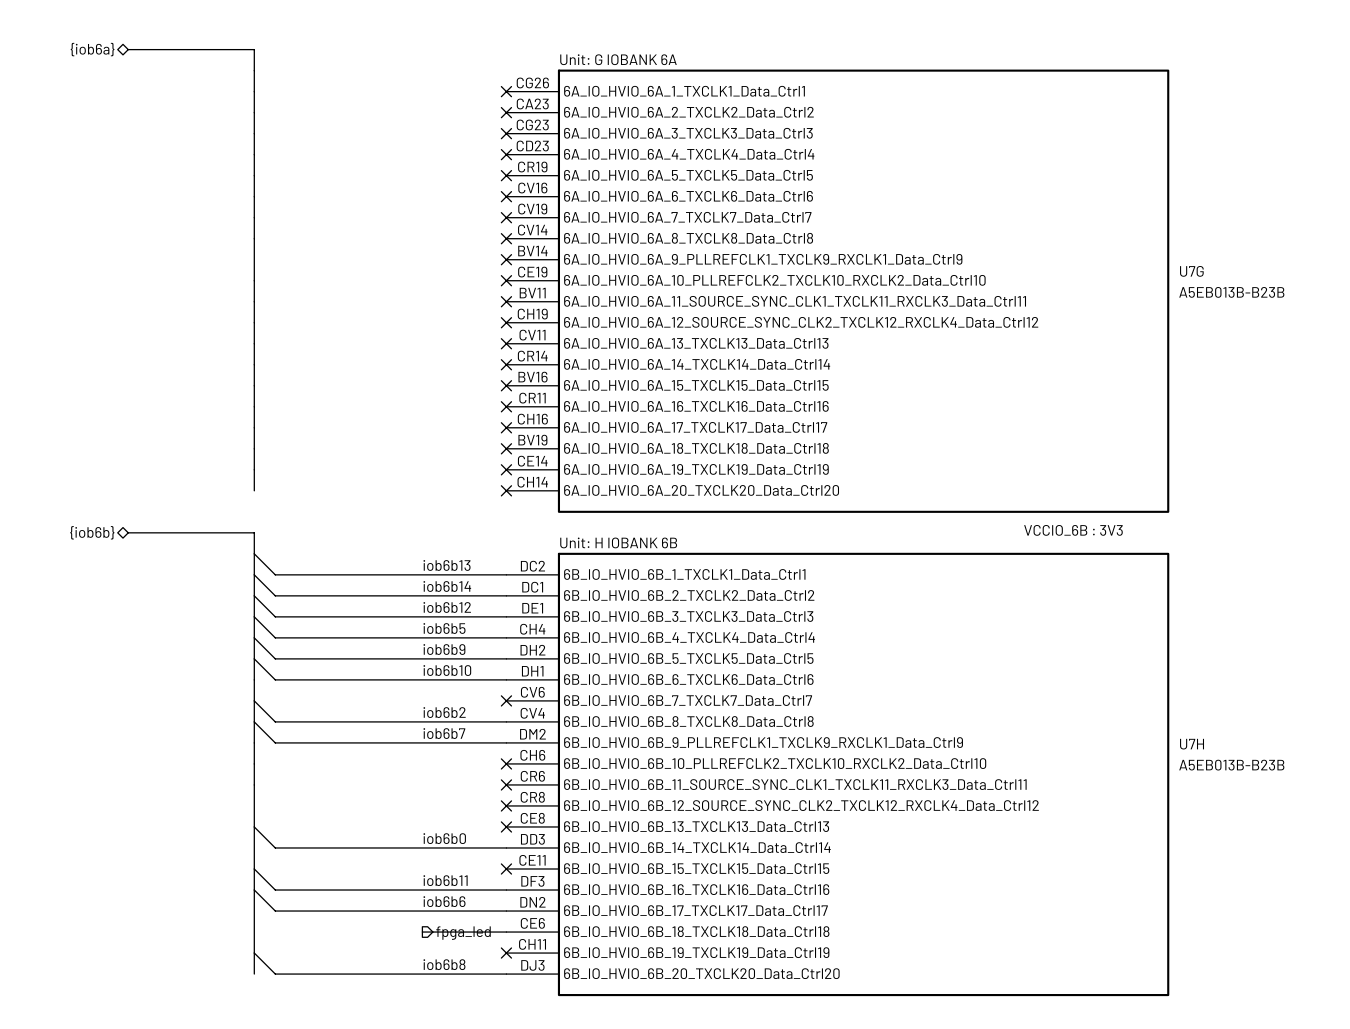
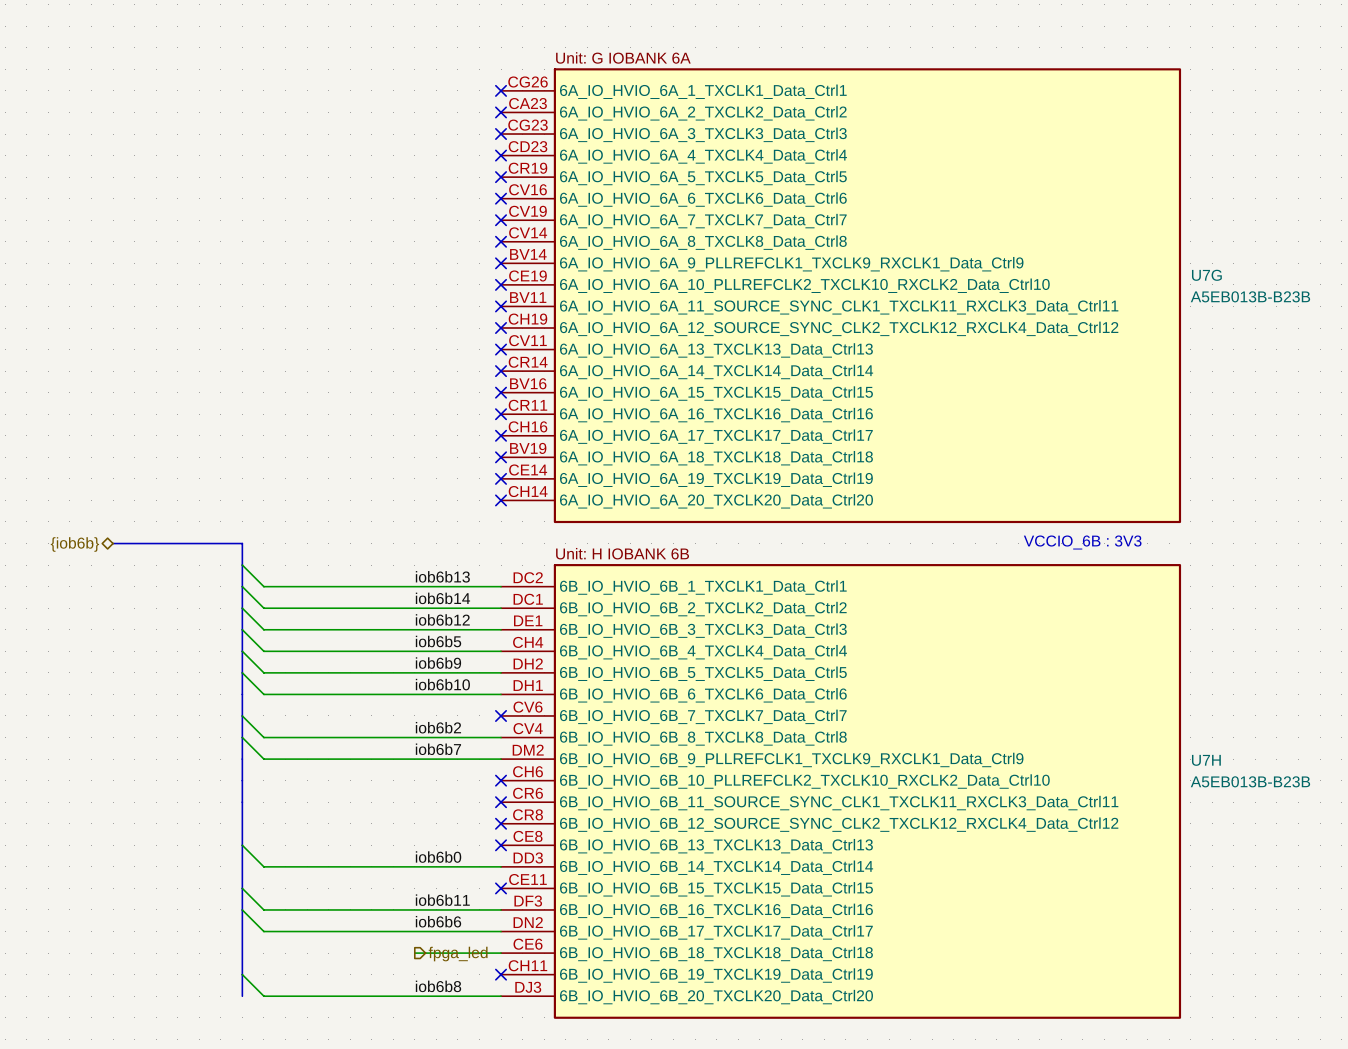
hierarchical label: {iob6a} (92, 49) -> none
bus: (128, 49) (254, 49) (254, 490) -> none

